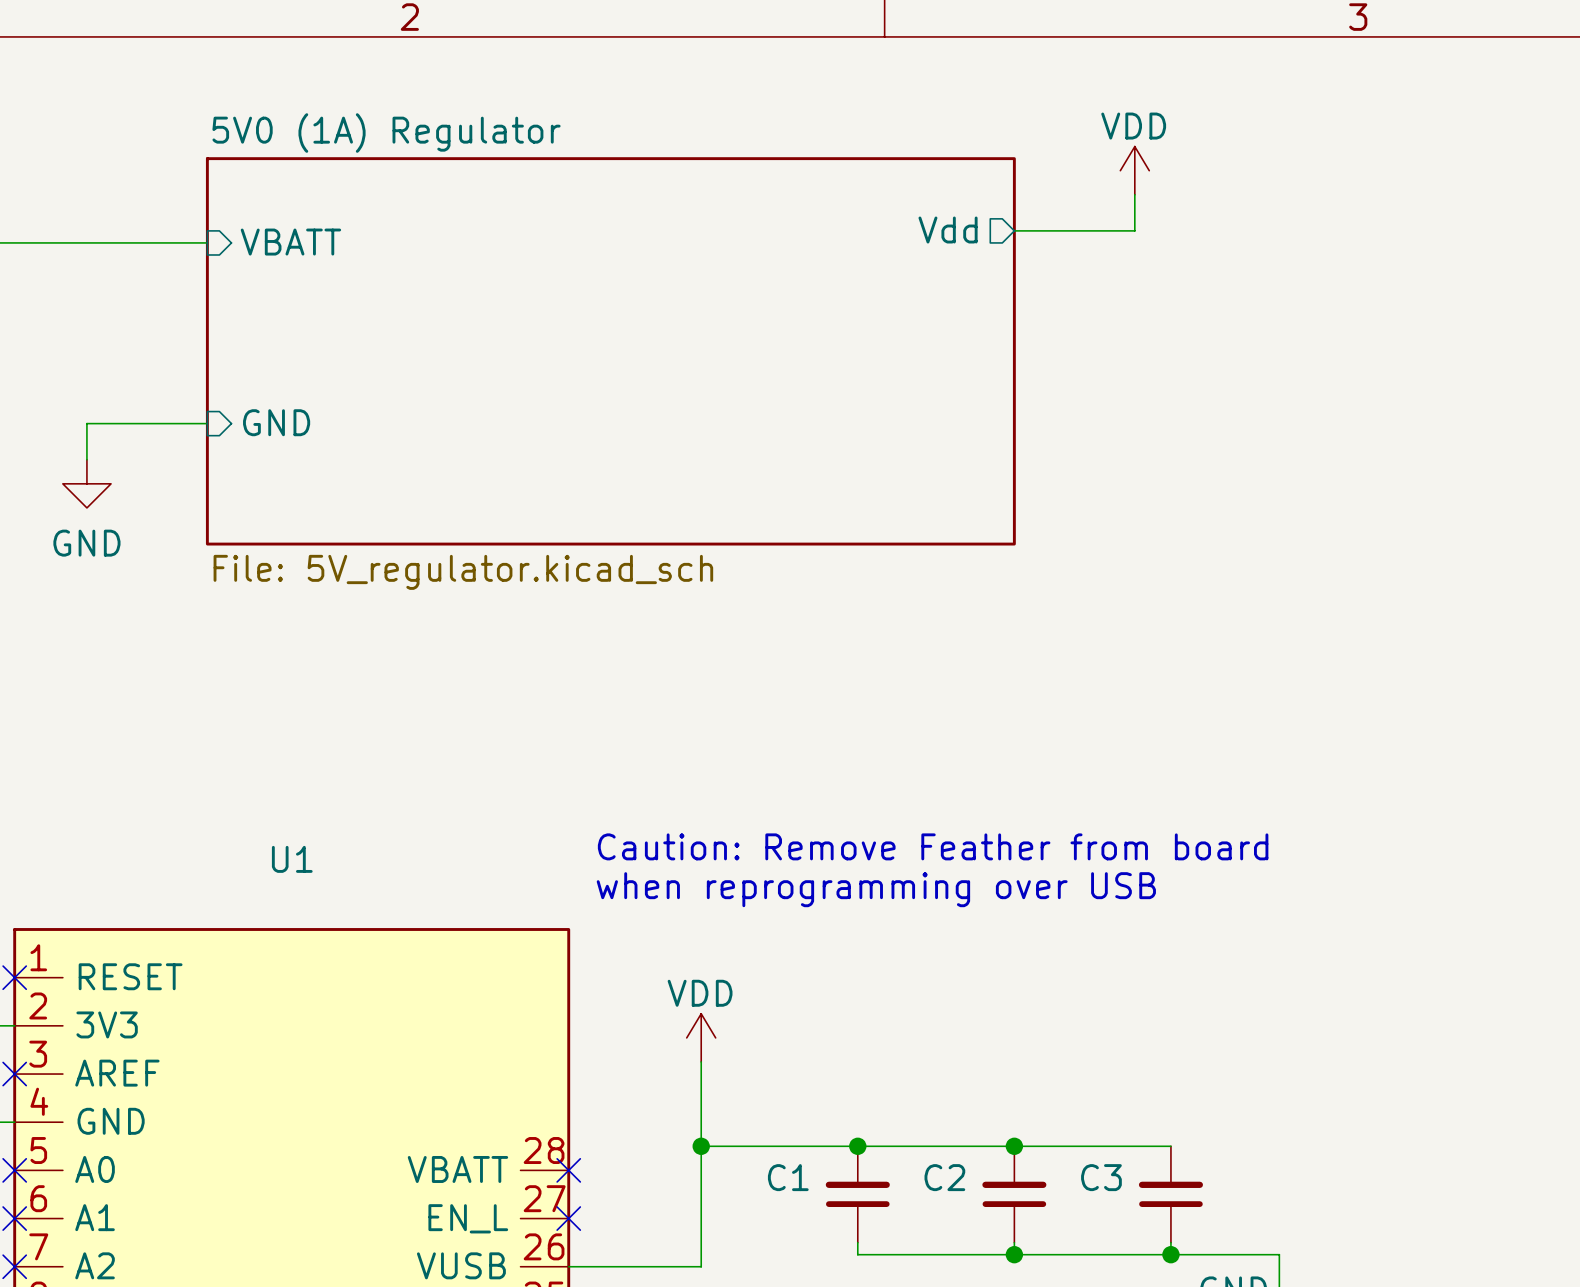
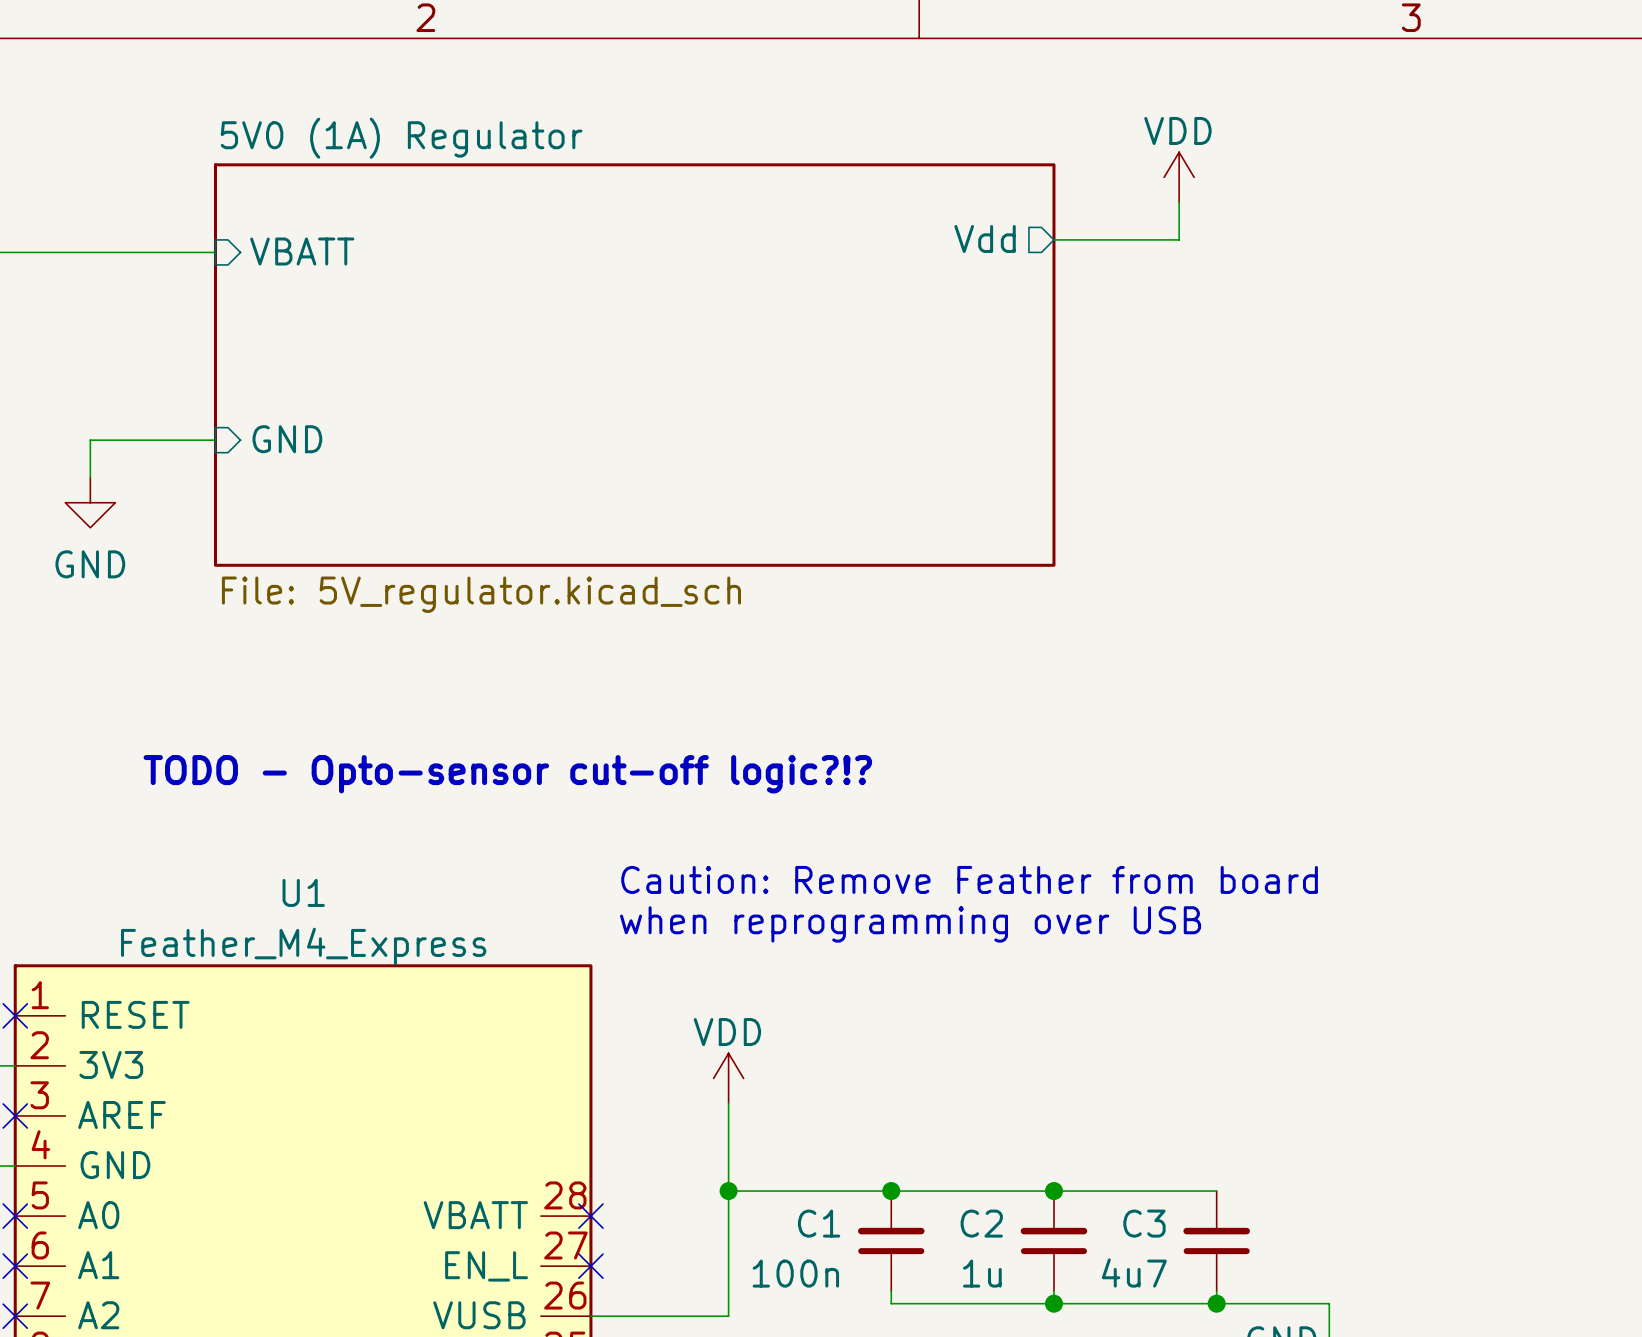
text: none -> TODO - Opto-sensor cut-off logic?!? (507, 774)
U1 value: none -> Feather_M4_Express (303, 946)
C1 value: none -> 100n (795, 1273)
C2 value: none -> 1u (982, 1273)
C3 value: none -> 4u7 (1134, 1272)

